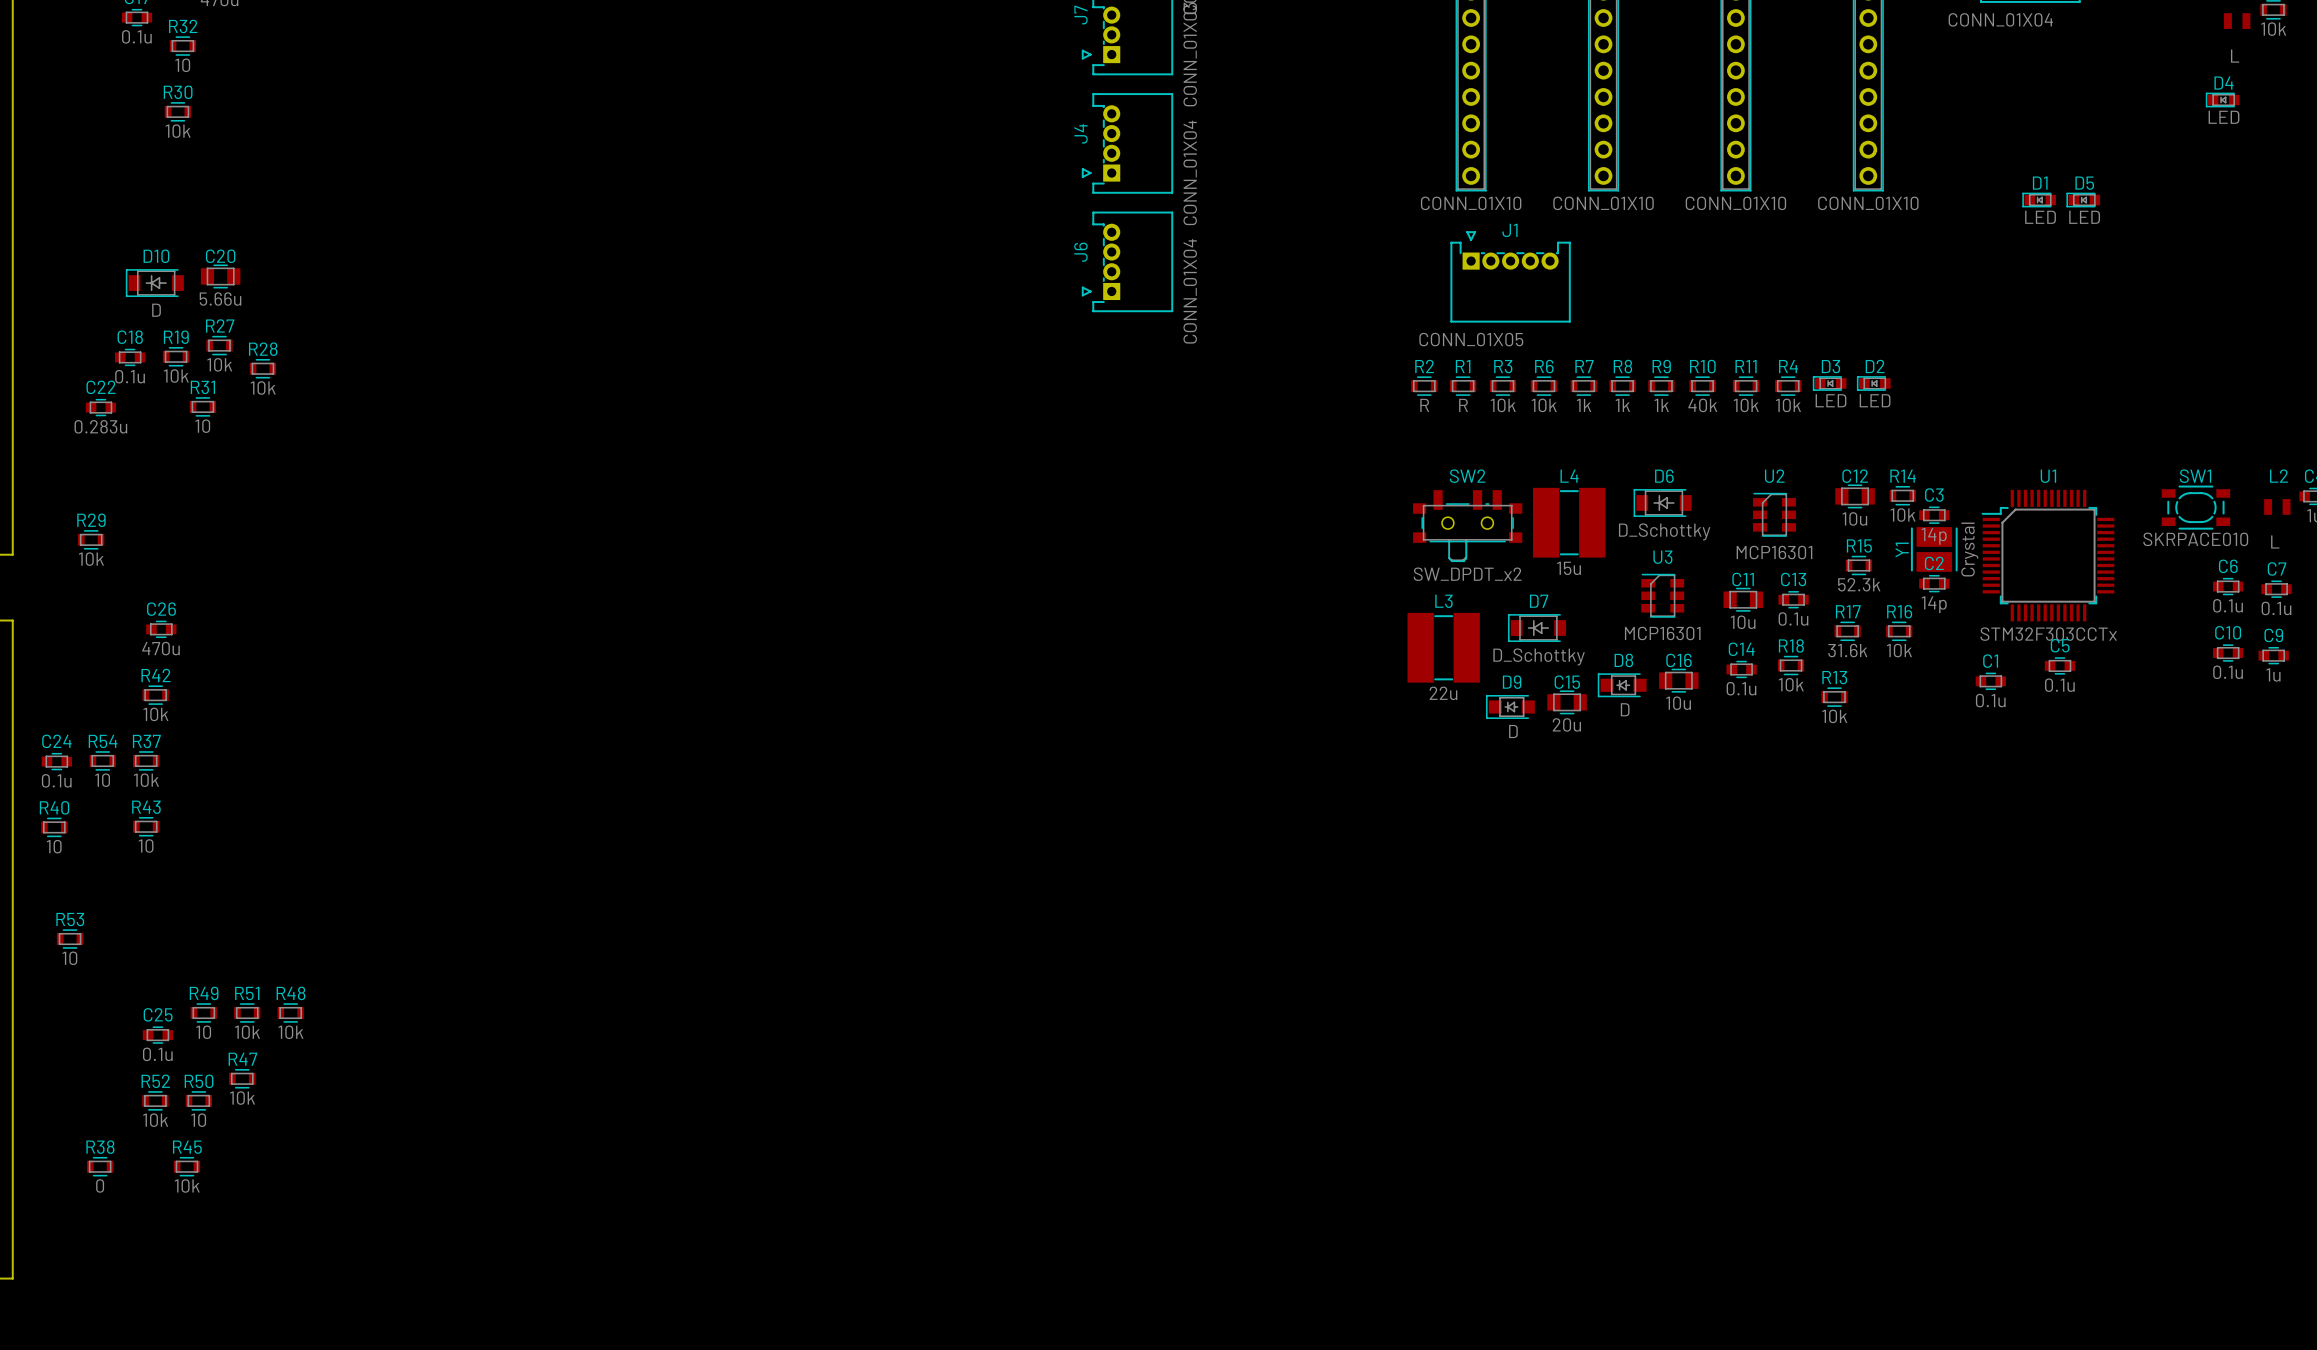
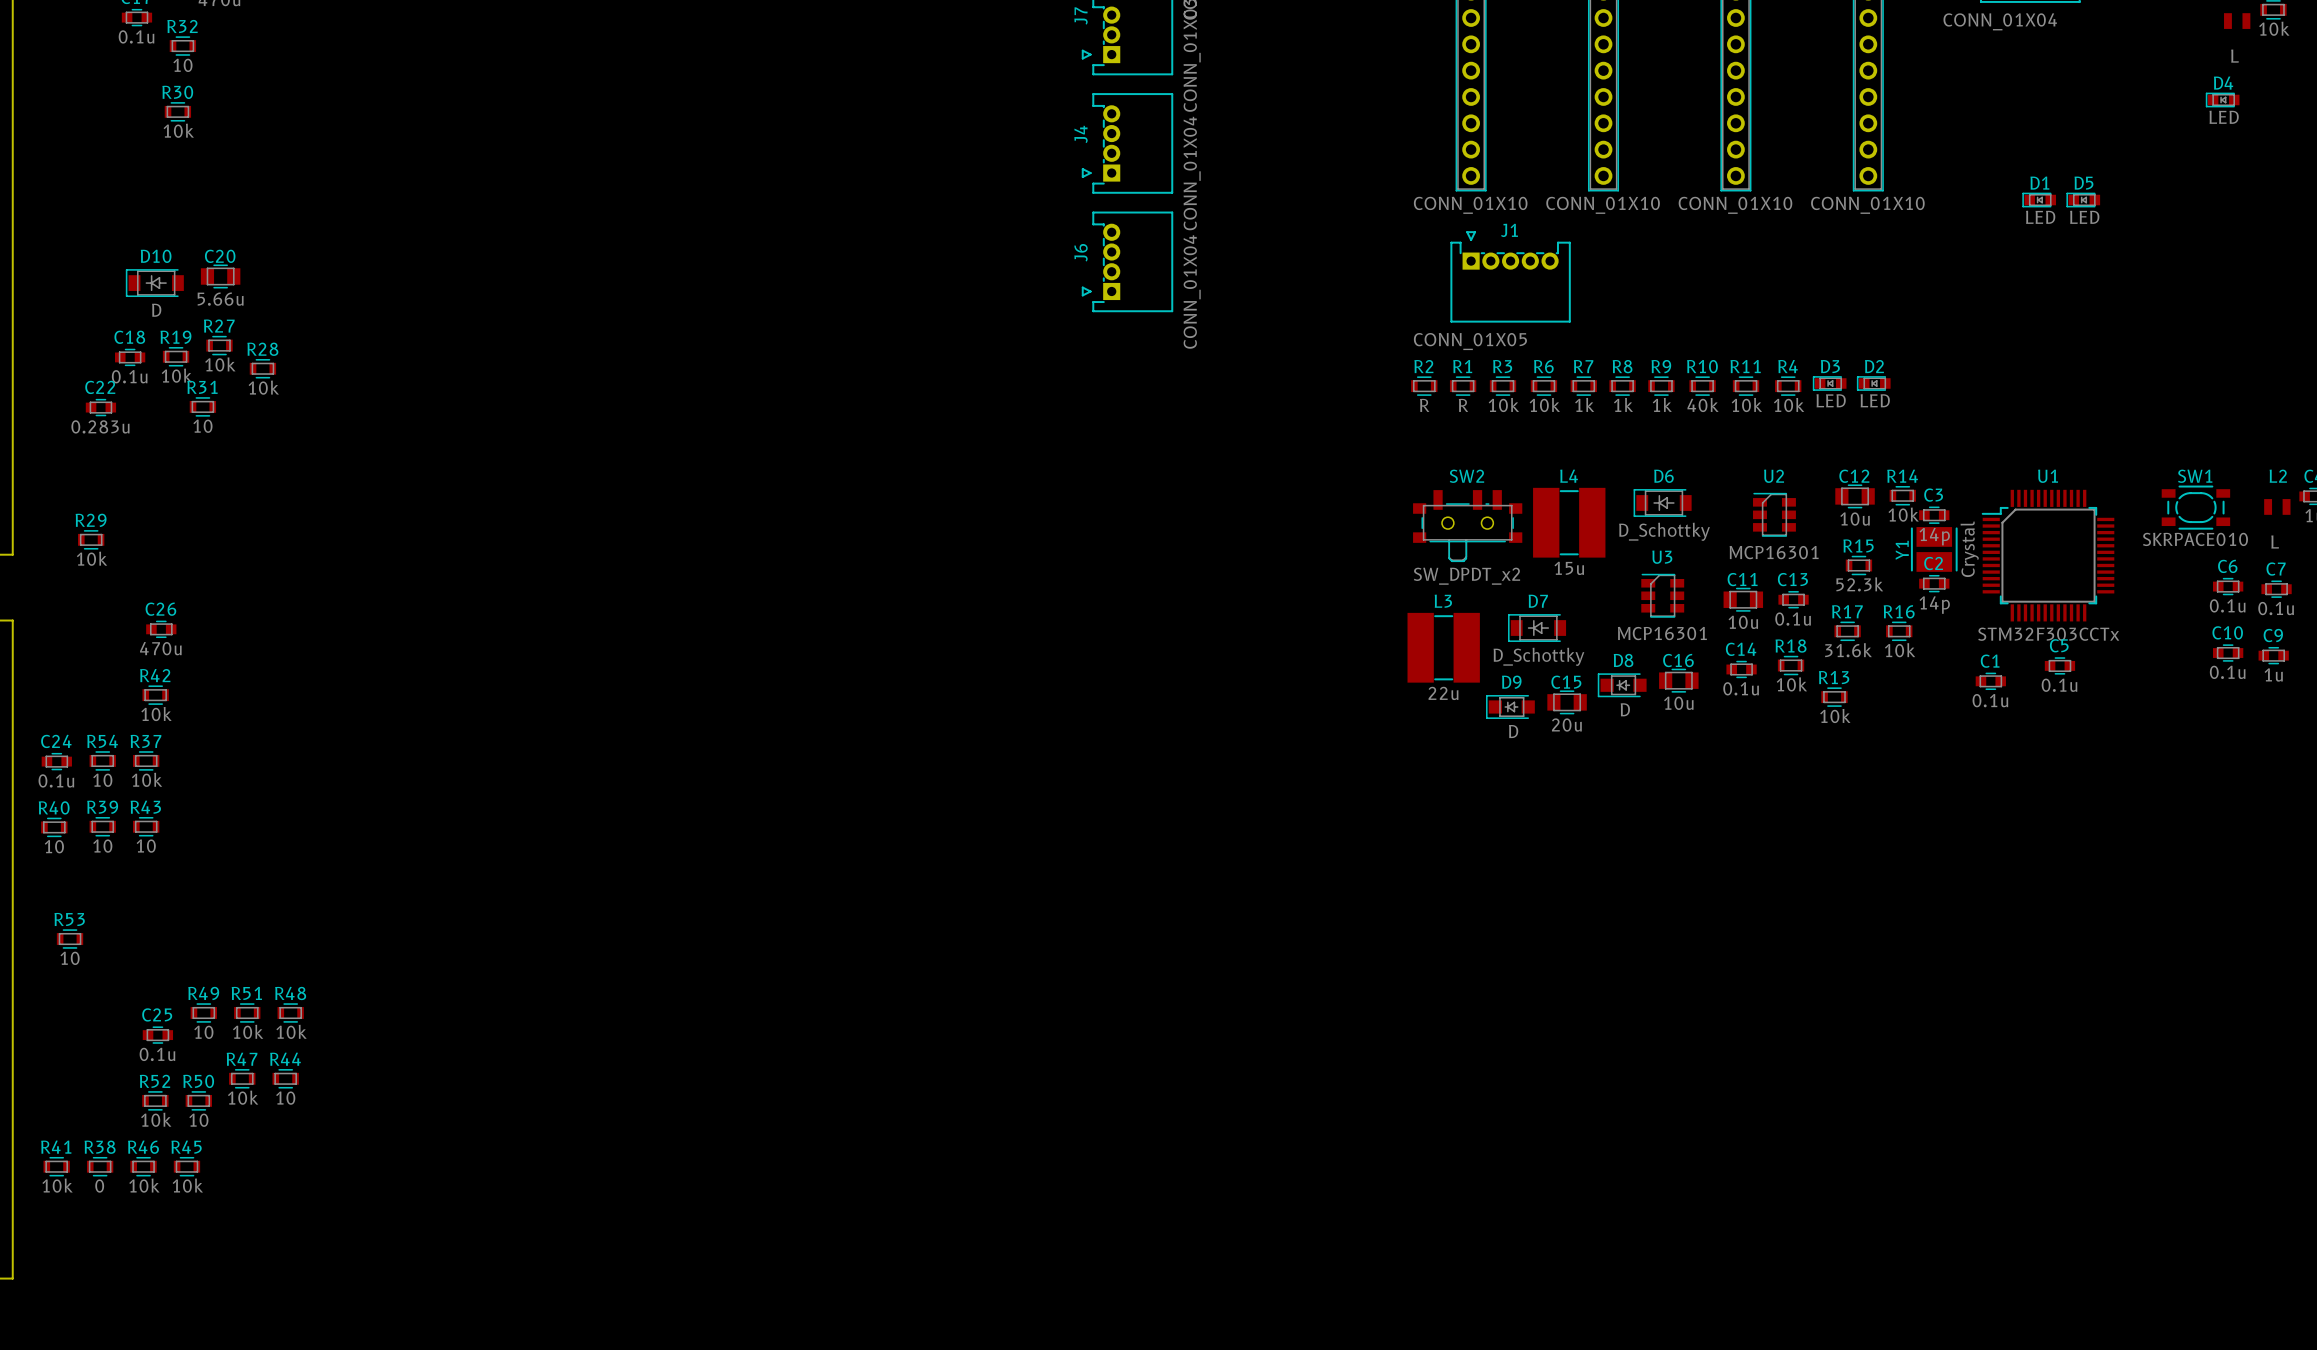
R39: none -> 10 (102, 826)
R44: none -> 10 (285, 1078)
R41: none -> 10k (56, 1166)
R46: none -> 10k (143, 1166)

